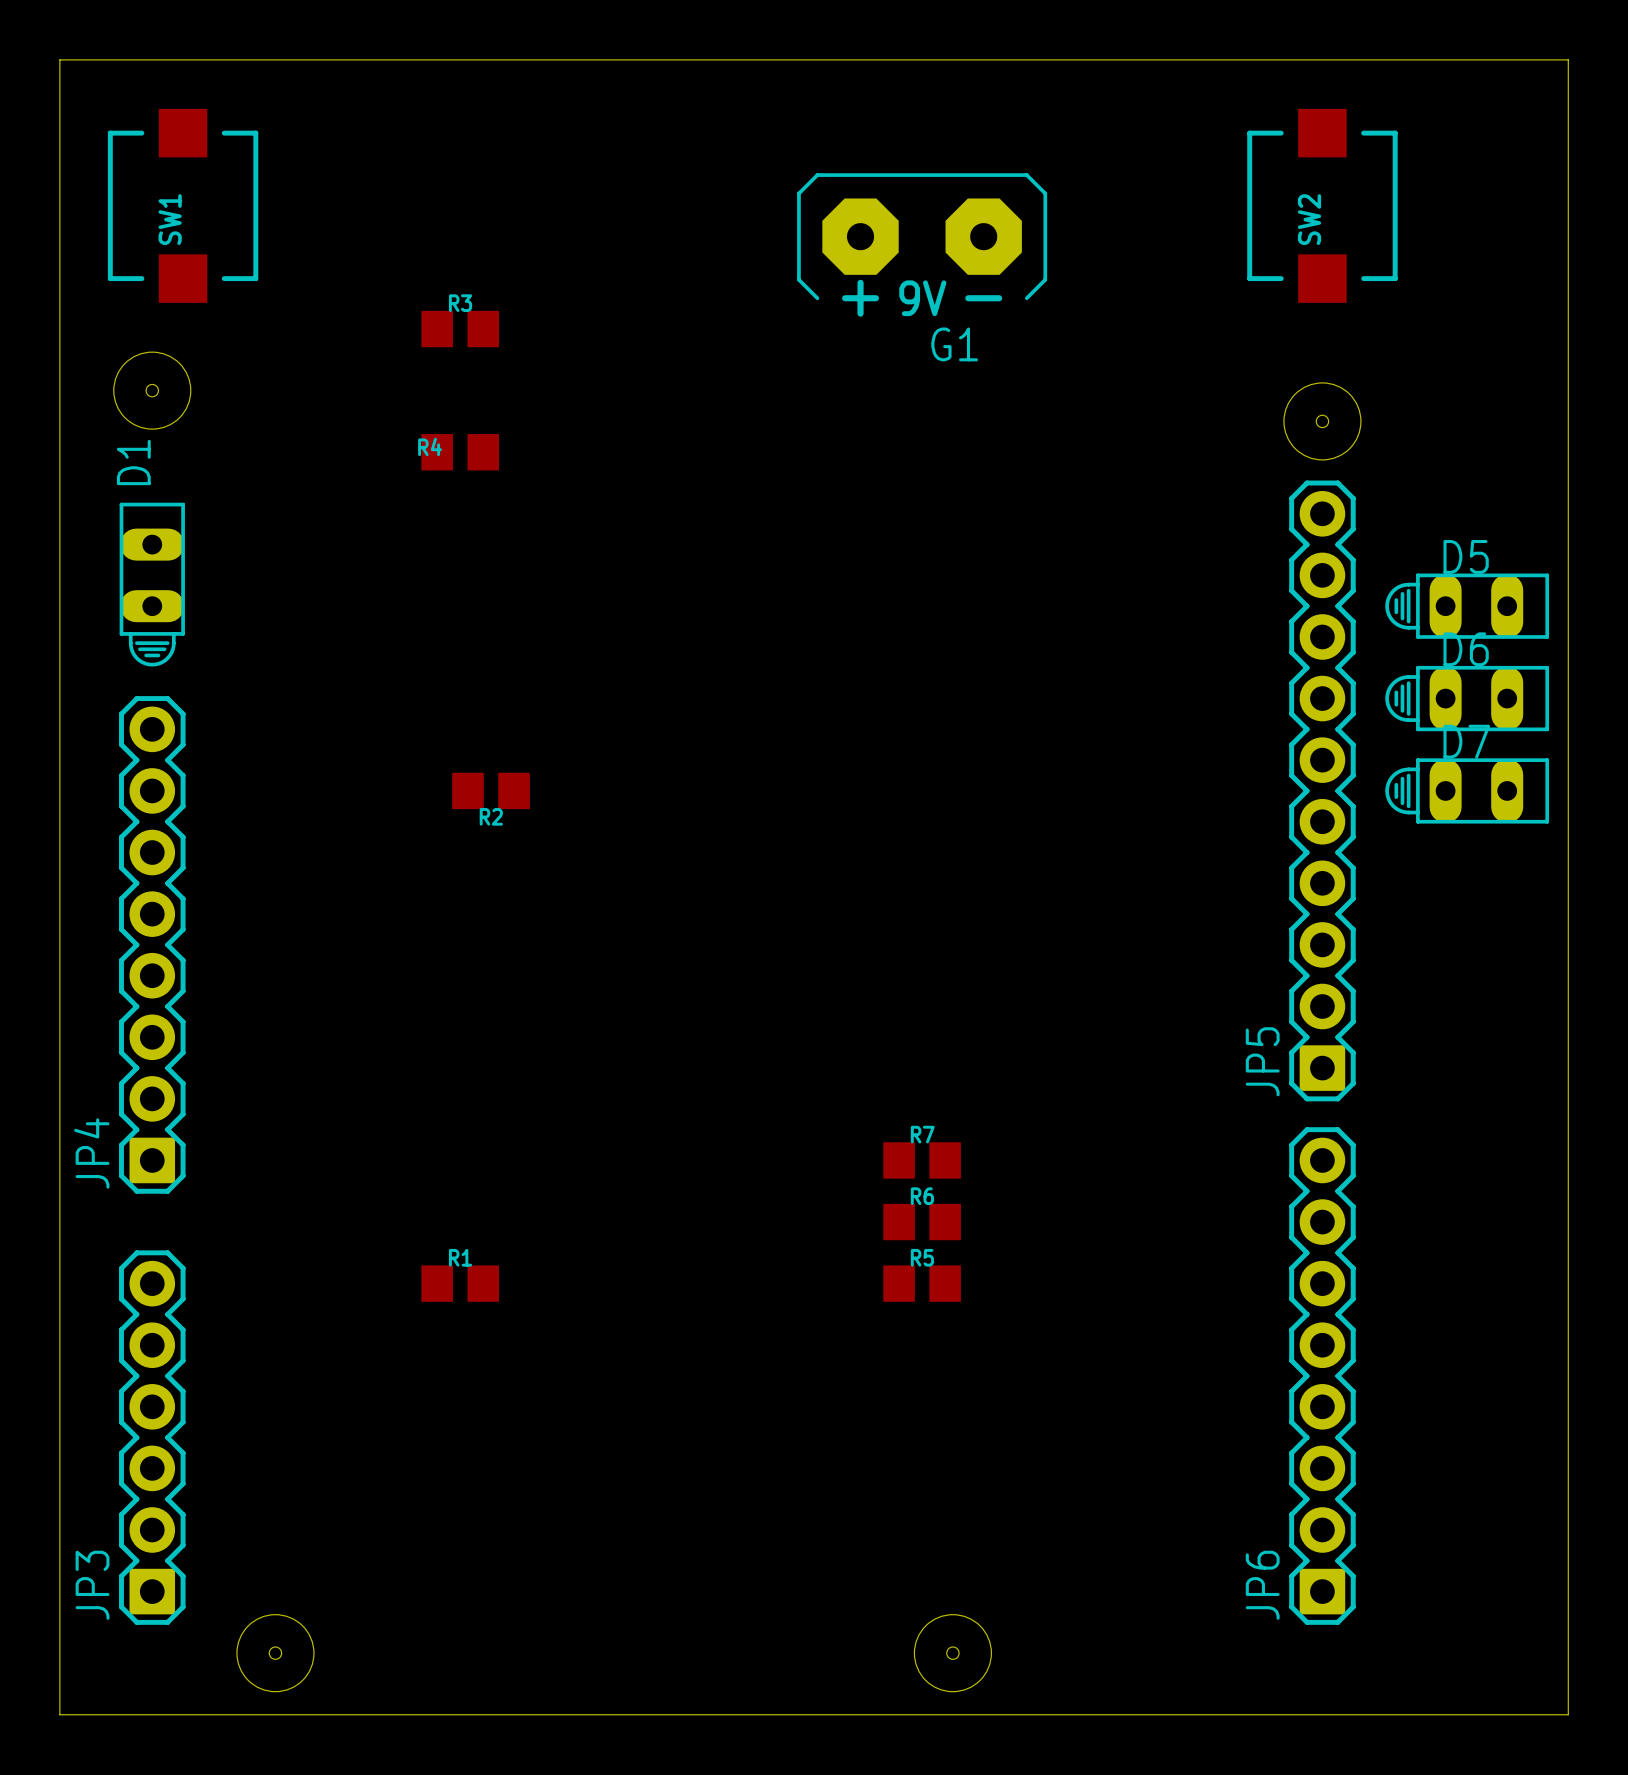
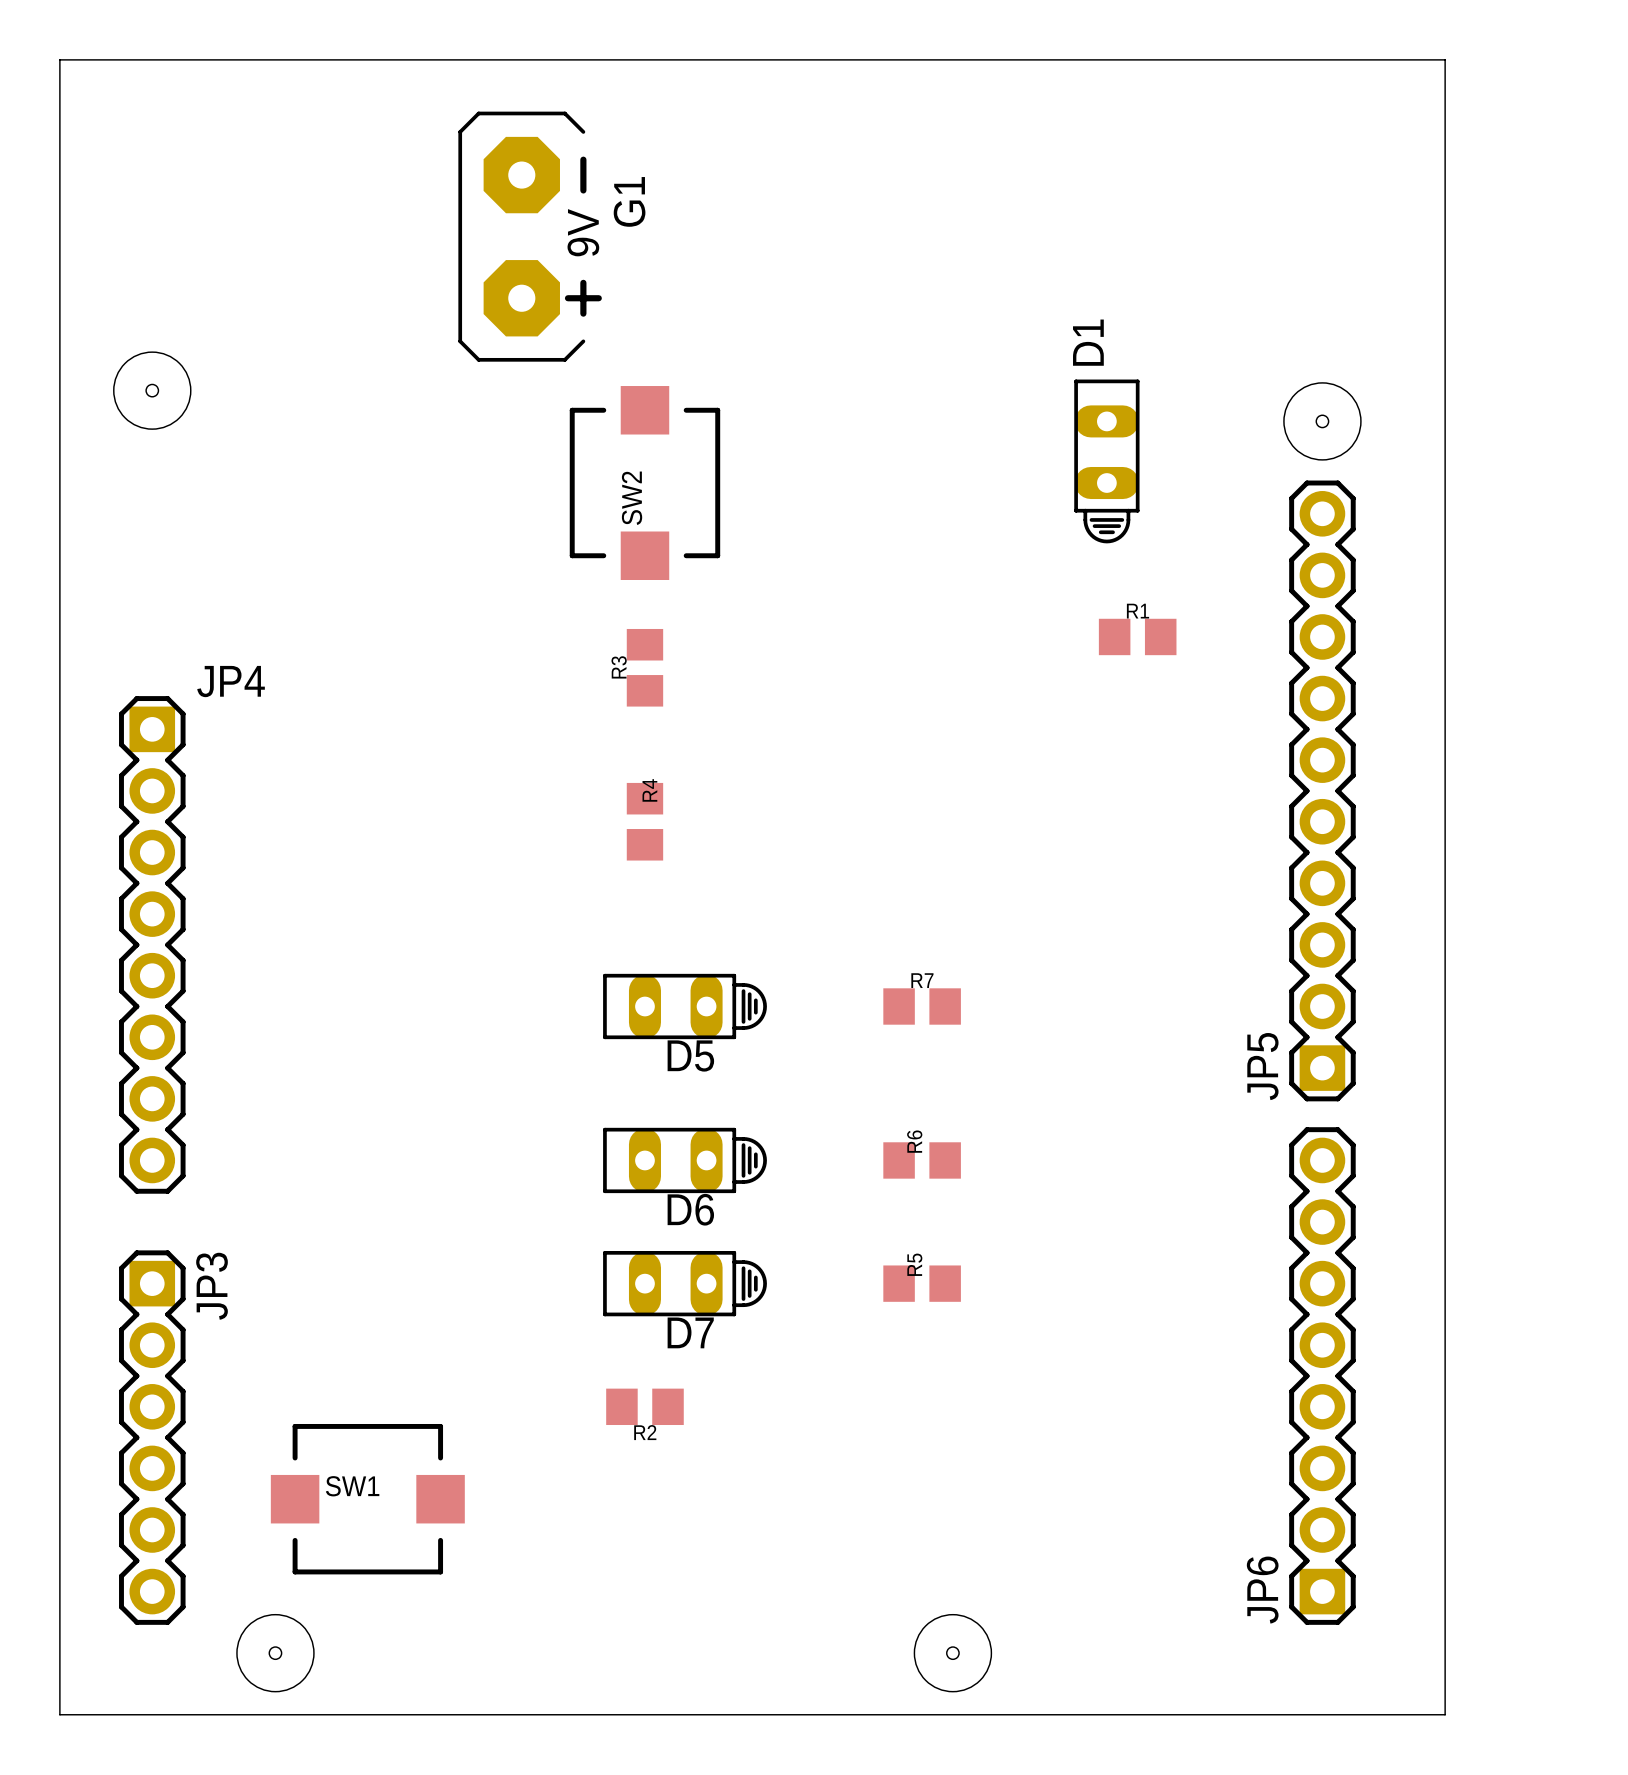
board edge: (1445, 59) (1568, 59) (1568, 1714) (1445, 1714) -> (1445, 59) (1445, 1714)
SW1 rotation: 0° (183, 205) -> 90° clockwise (367, 1499)
SW1 position: (183, 205) -> (367, 1499)
SW2 position: (1322, 205) -> (644, 483)
G1 rotation: 0° (922, 244) -> 90° counterclockwise (530, 236)
G1 position: (922, 244) -> (530, 236)
R3 rotation: 0° (460, 329) -> 90° clockwise (644, 667)
R3 position: (460, 329) -> (644, 667)
R4 rotation: 0° (460, 452) -> 90° clockwise (644, 821)
R4 position: (460, 452) -> (644, 821)
D1 position: (152, 584) -> (1106, 461)
D5 rotation: 0° (1467, 606) -> 180° (685, 1006)
D5 position: (1467, 606) -> (685, 1006)
D6 rotation: 0° (1467, 698) -> 180° (685, 1160)
D6 position: (1467, 698) -> (685, 1160)
R2 position: (491, 790) -> (644, 1406)
D7 rotation: 0° (1467, 790) -> 180° (685, 1283)
D7 position: (1467, 790) -> (685, 1283)
JP4 rotation: 0° (152, 944) -> 180° (152, 944)
R7: none -> (922, 1006)
R7 name: R7 (922, 1134) -> R6 (914, 1141)
JP4 name position: JP4 (91, 1153) -> JP4 (231, 681)
R6: (922, 1222) -> none
R5 name rotation: 0° (922, 1257) -> 90° counterclockwise (914, 1264)
R1 position: (460, 1283) -> (1137, 636)
JP3 rotation: 0° (152, 1437) -> 180° (152, 1437)

